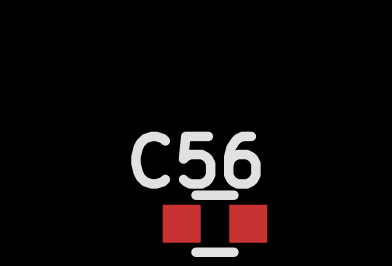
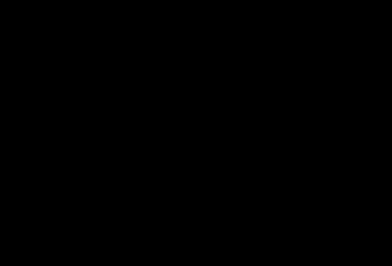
C56: (214, 223) -> none

